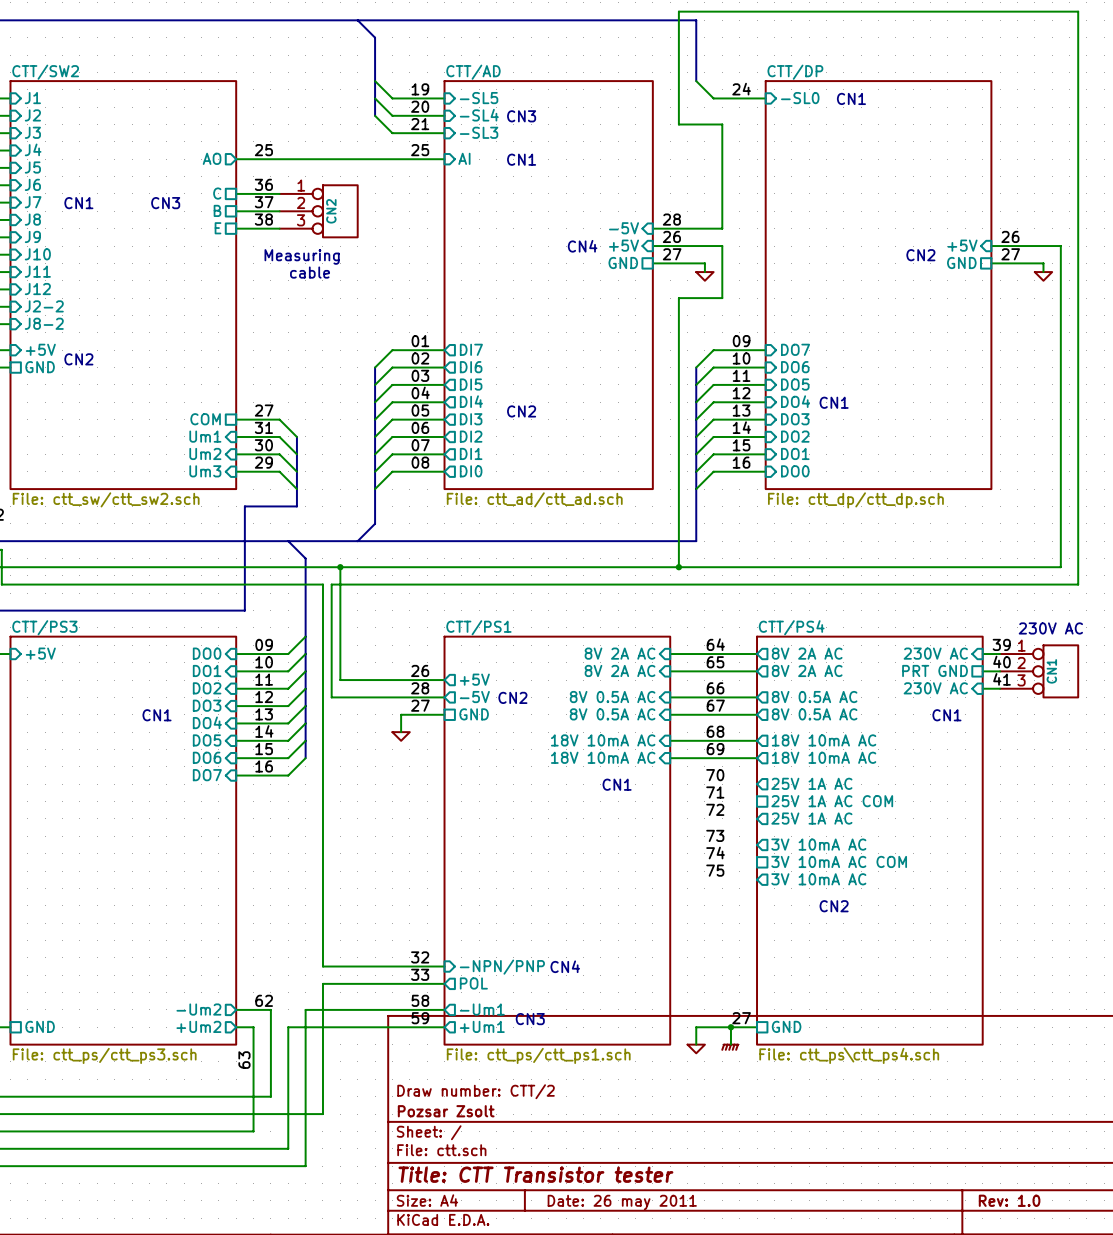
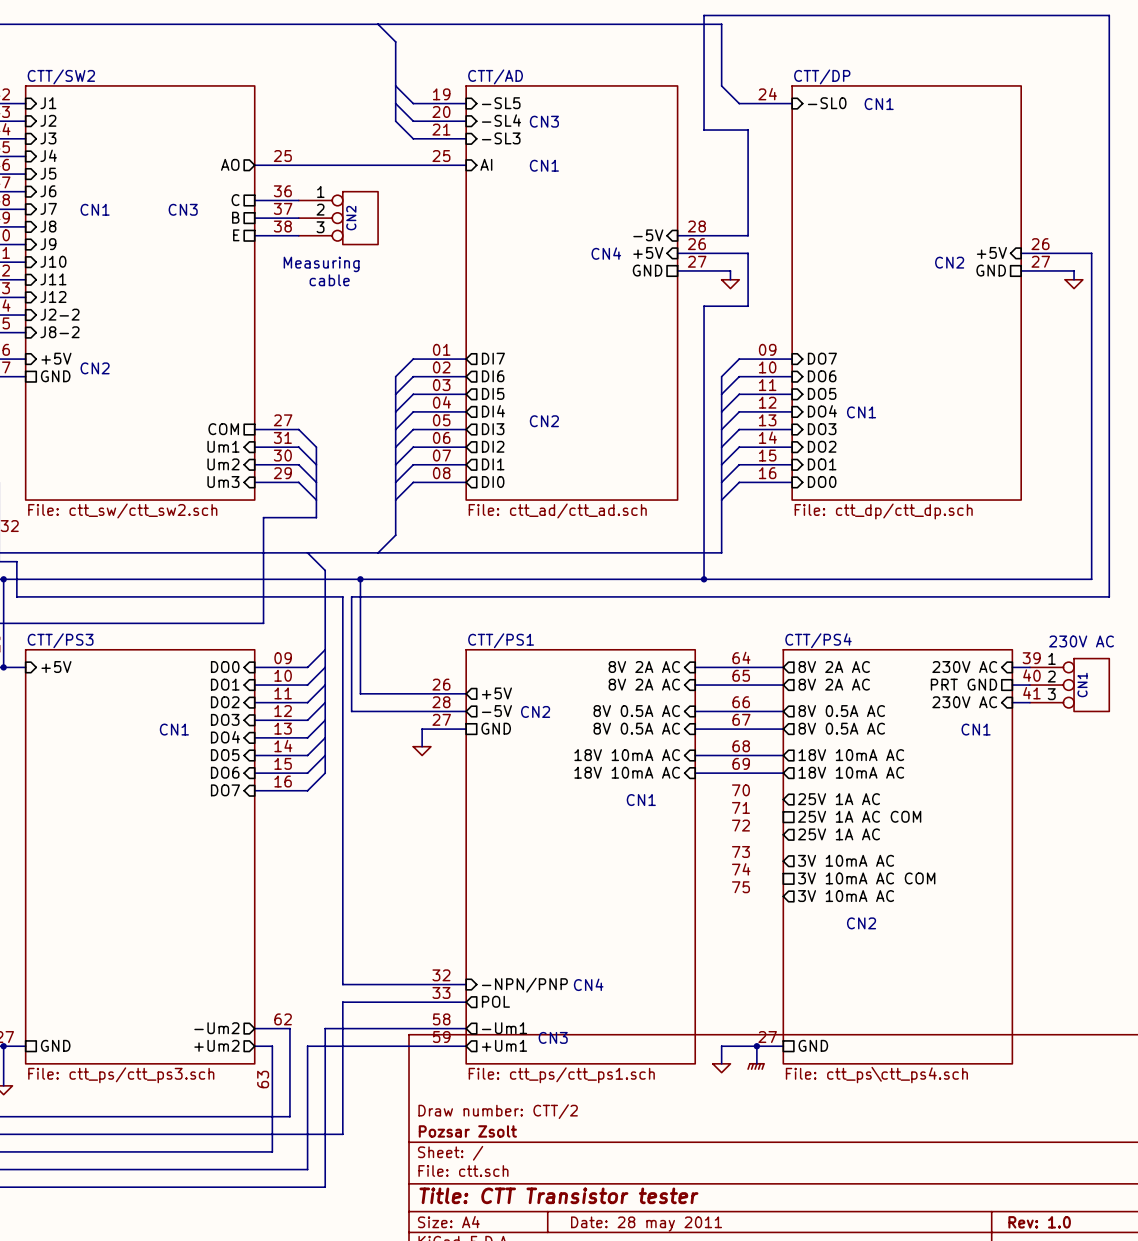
title block: Date: 26 may 2011 (622, 1202) -> Date: 28 may 2011 (646, 1224)

